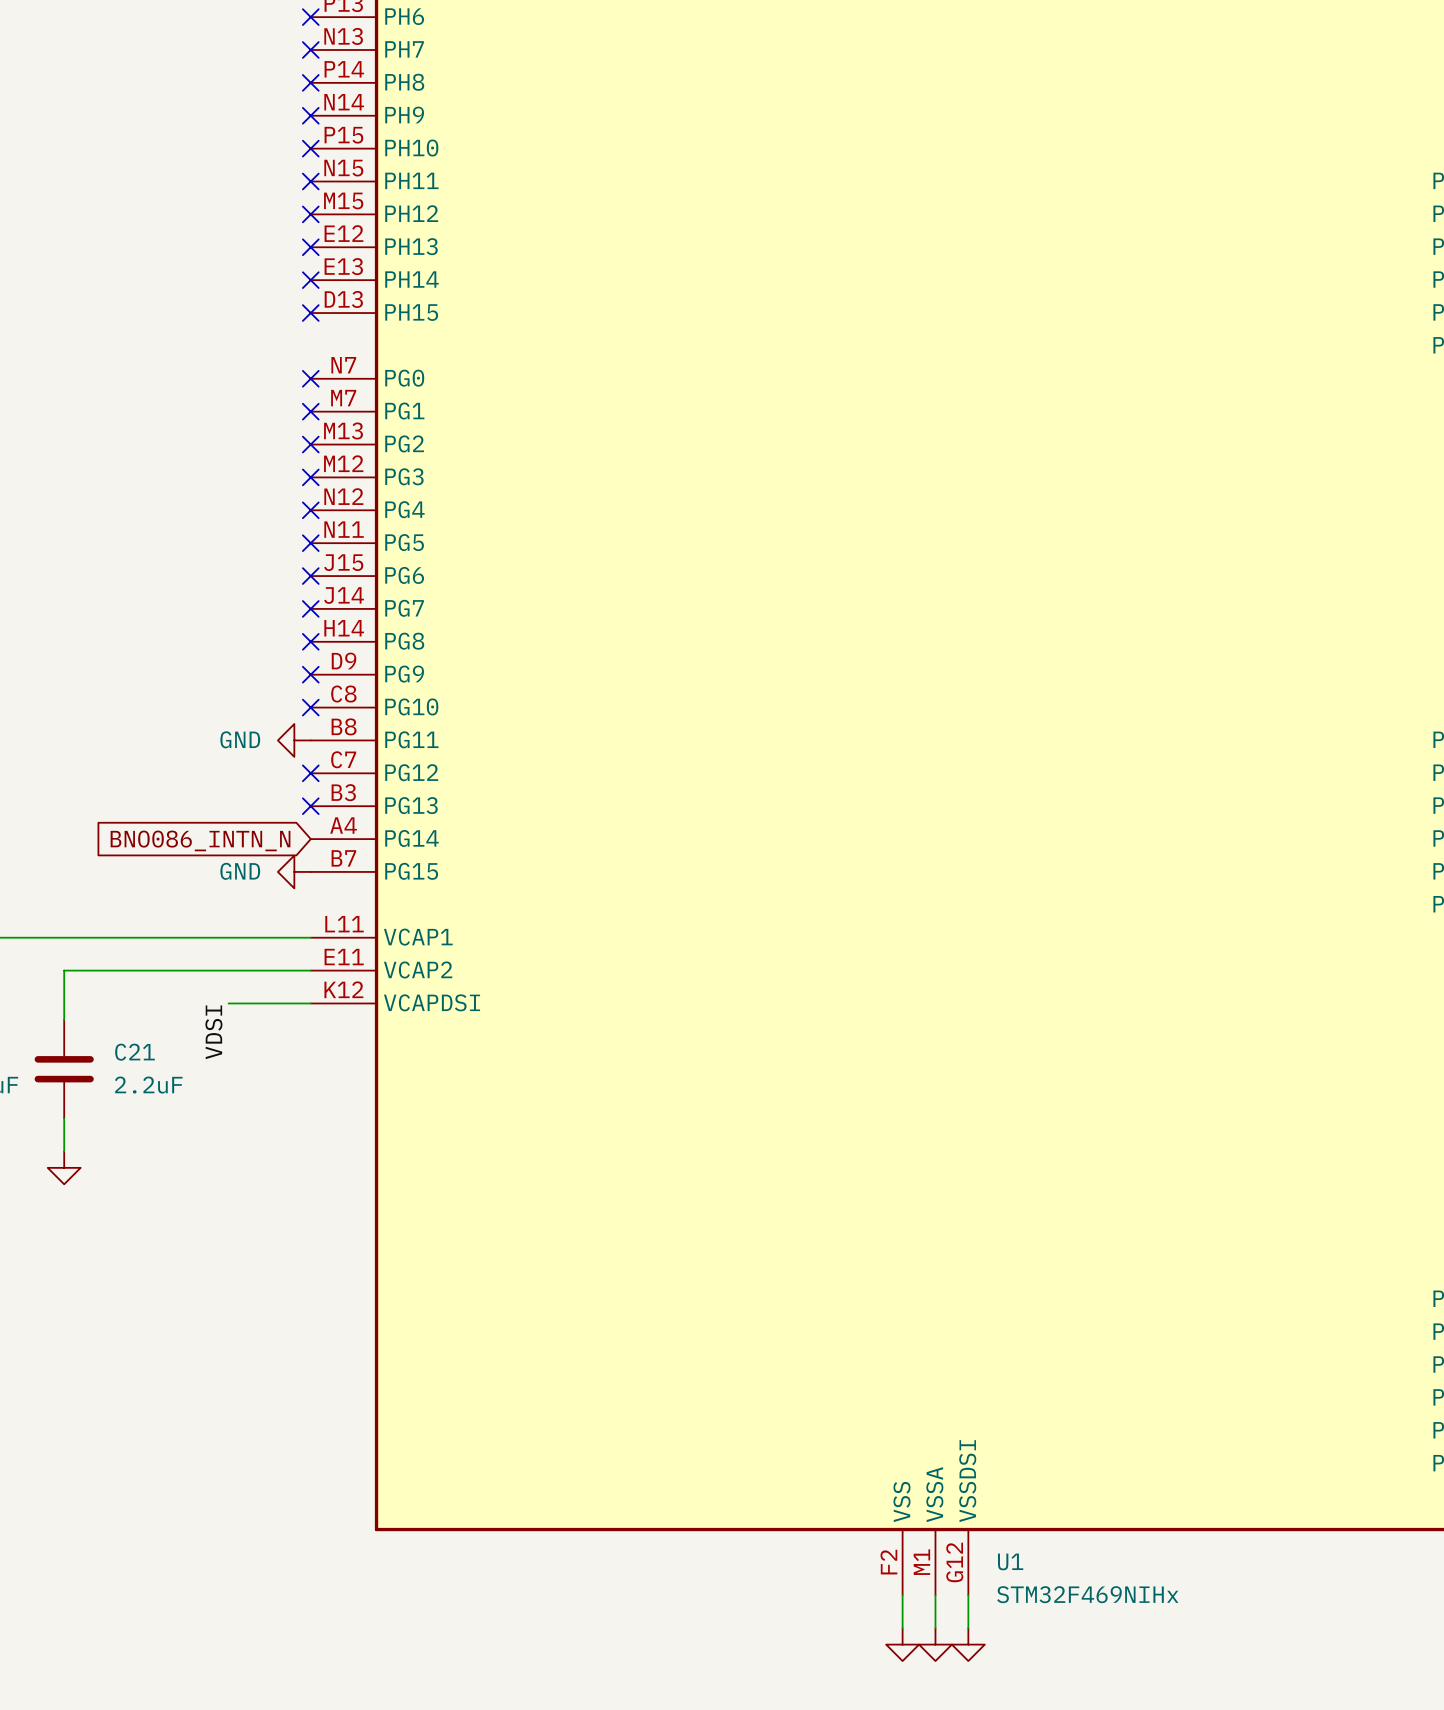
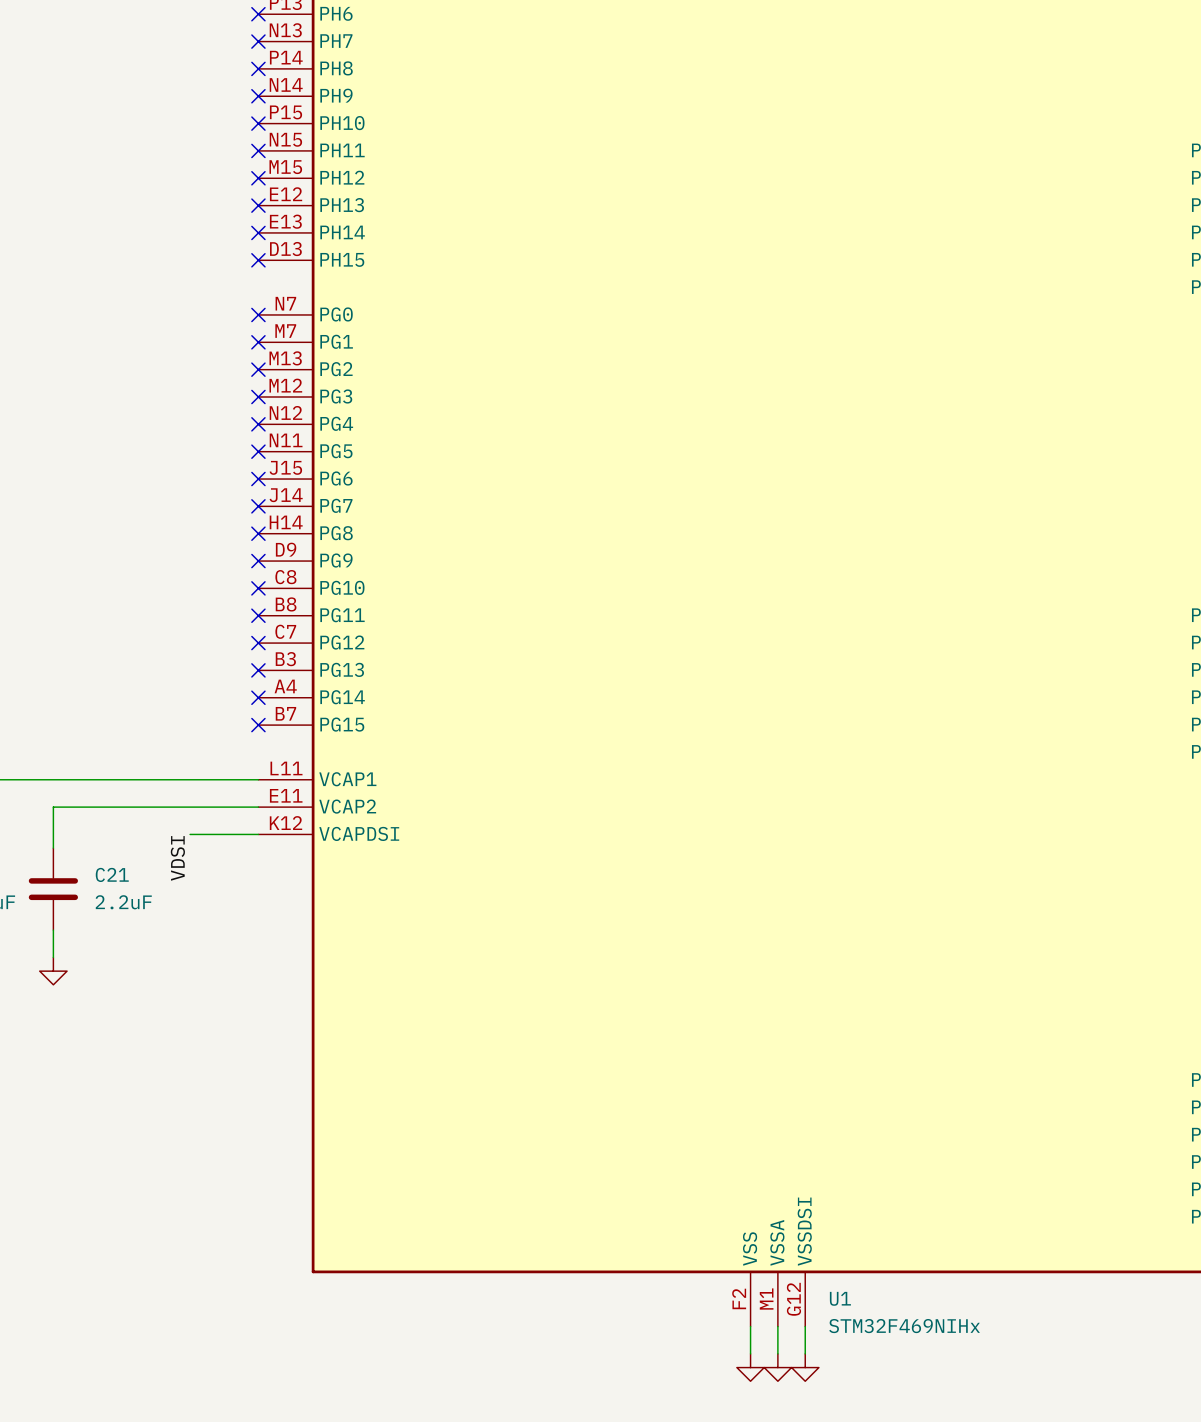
power symbol: GND (294, 740) -> none
no-connect mark: none -> (258, 615)
no-connect mark: none -> (258, 697)
global label: BNO086_INTN_N (200, 840) -> none
power symbol: GND (294, 871) -> none
no-connect mark: none -> (258, 725)

